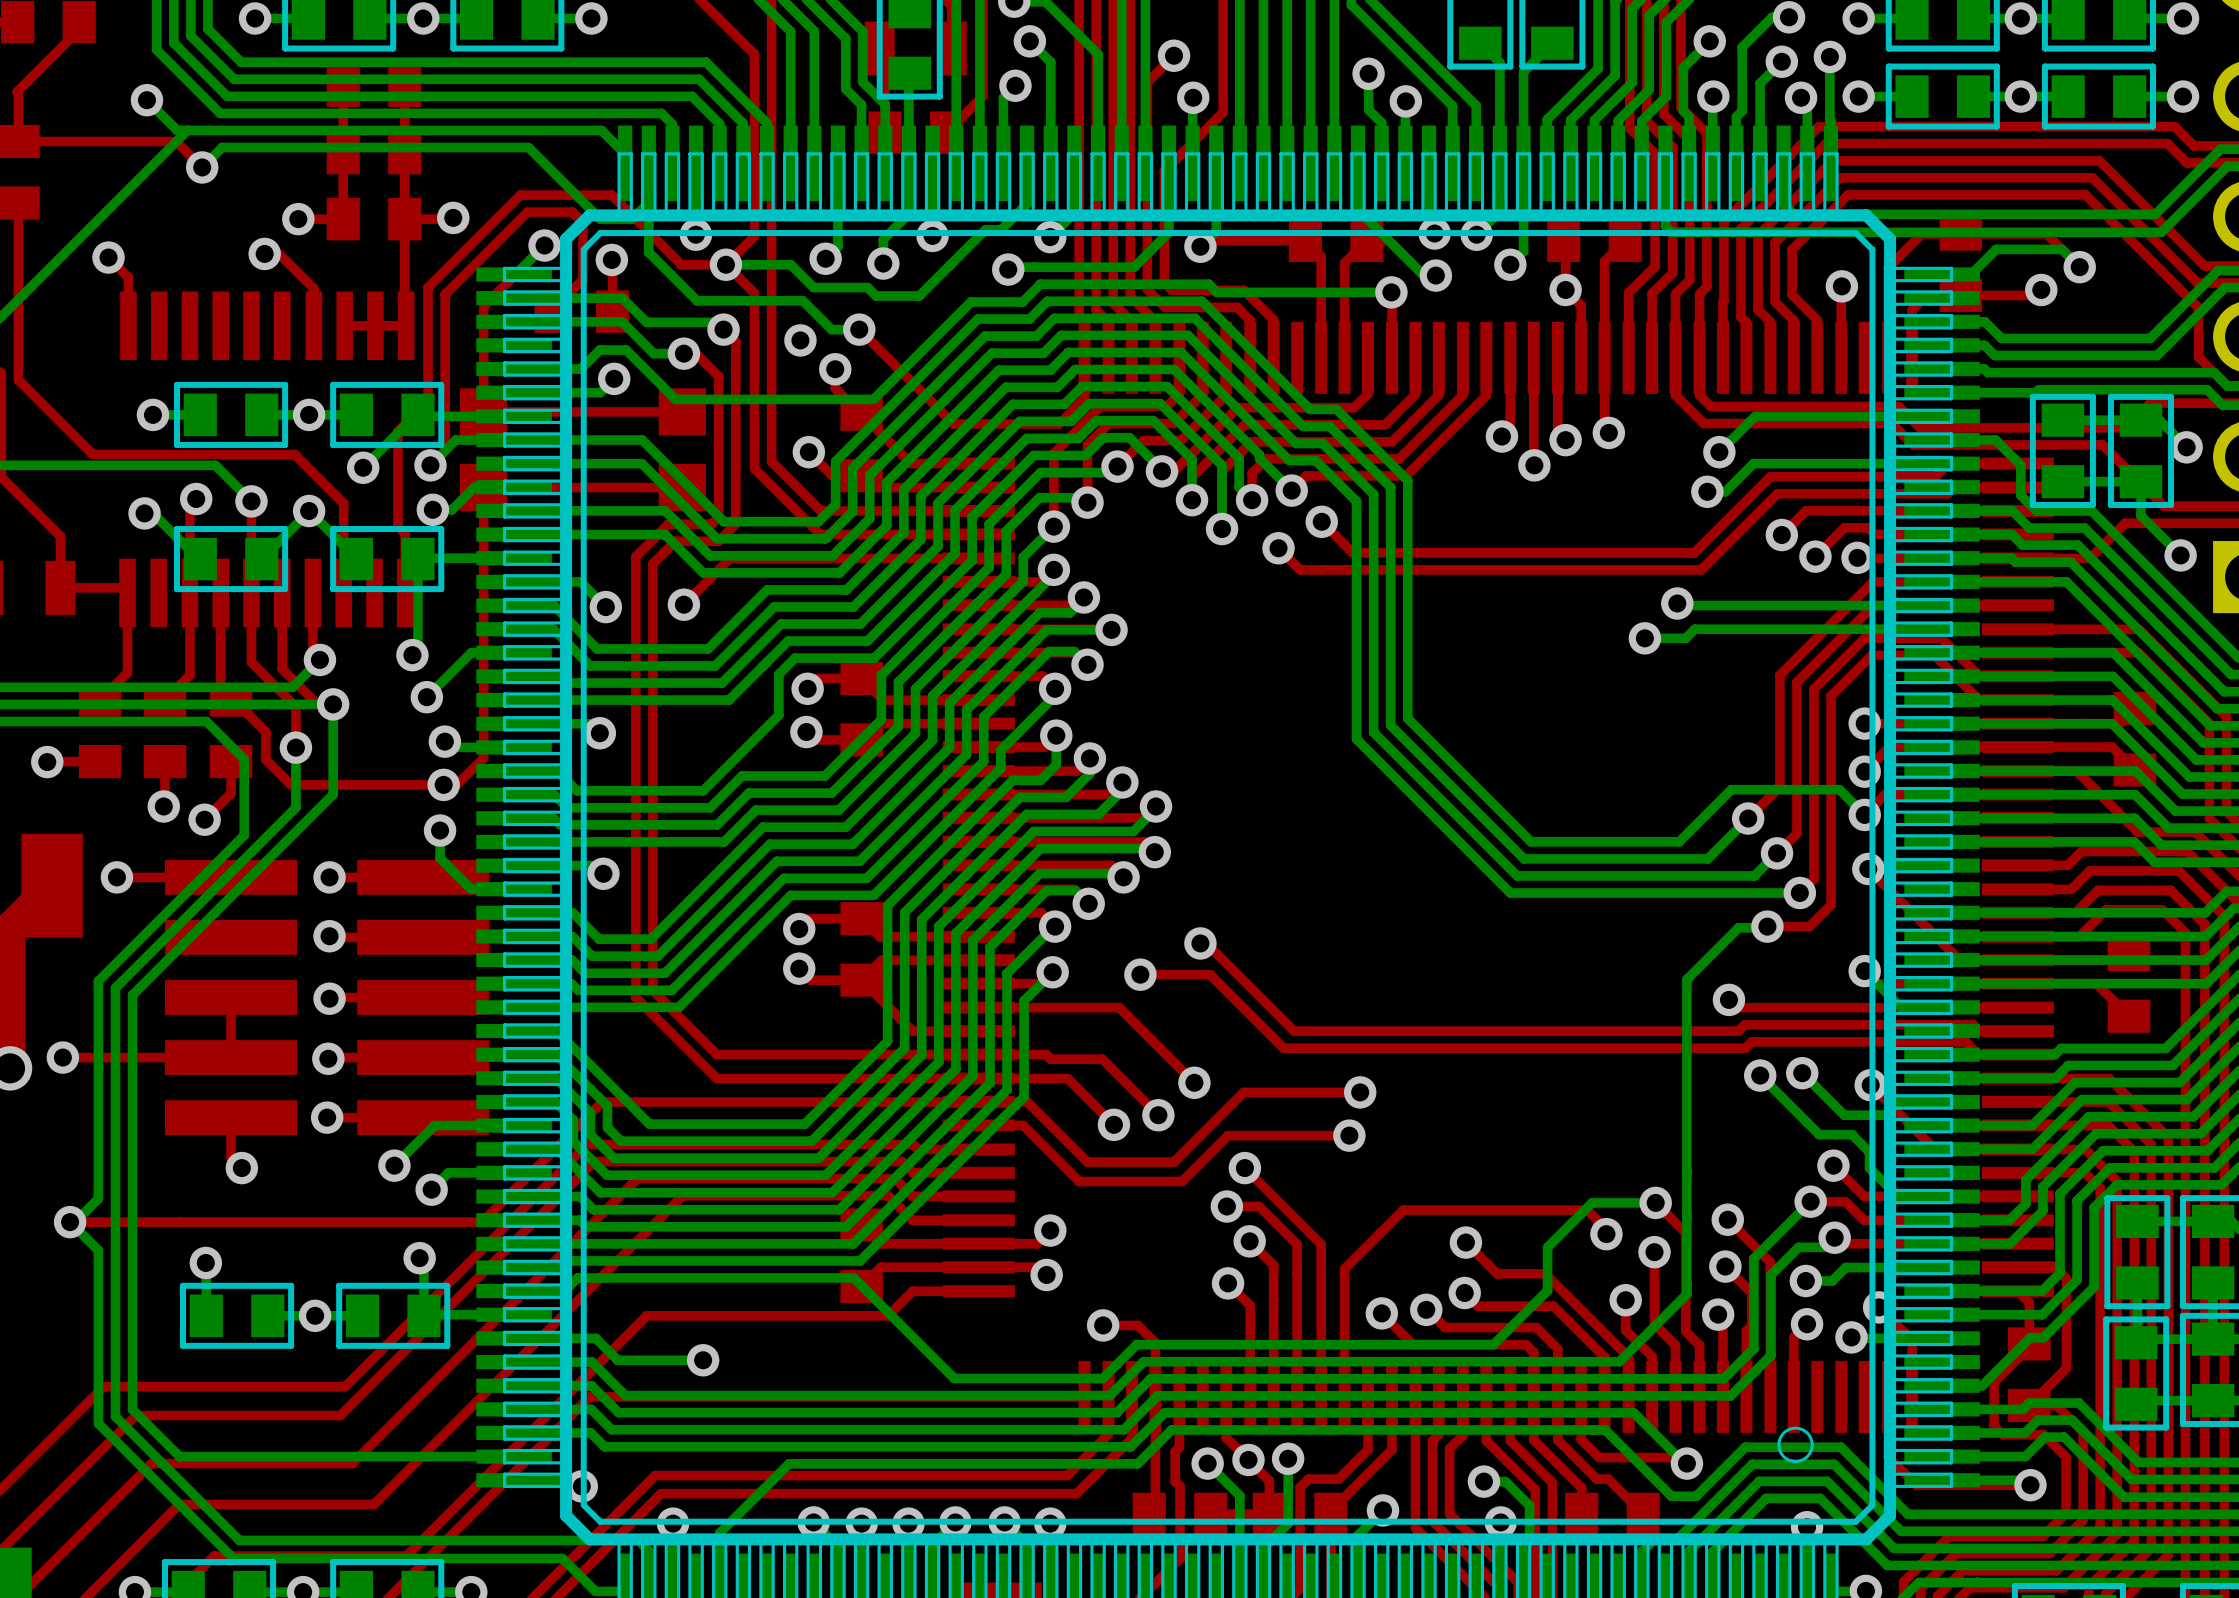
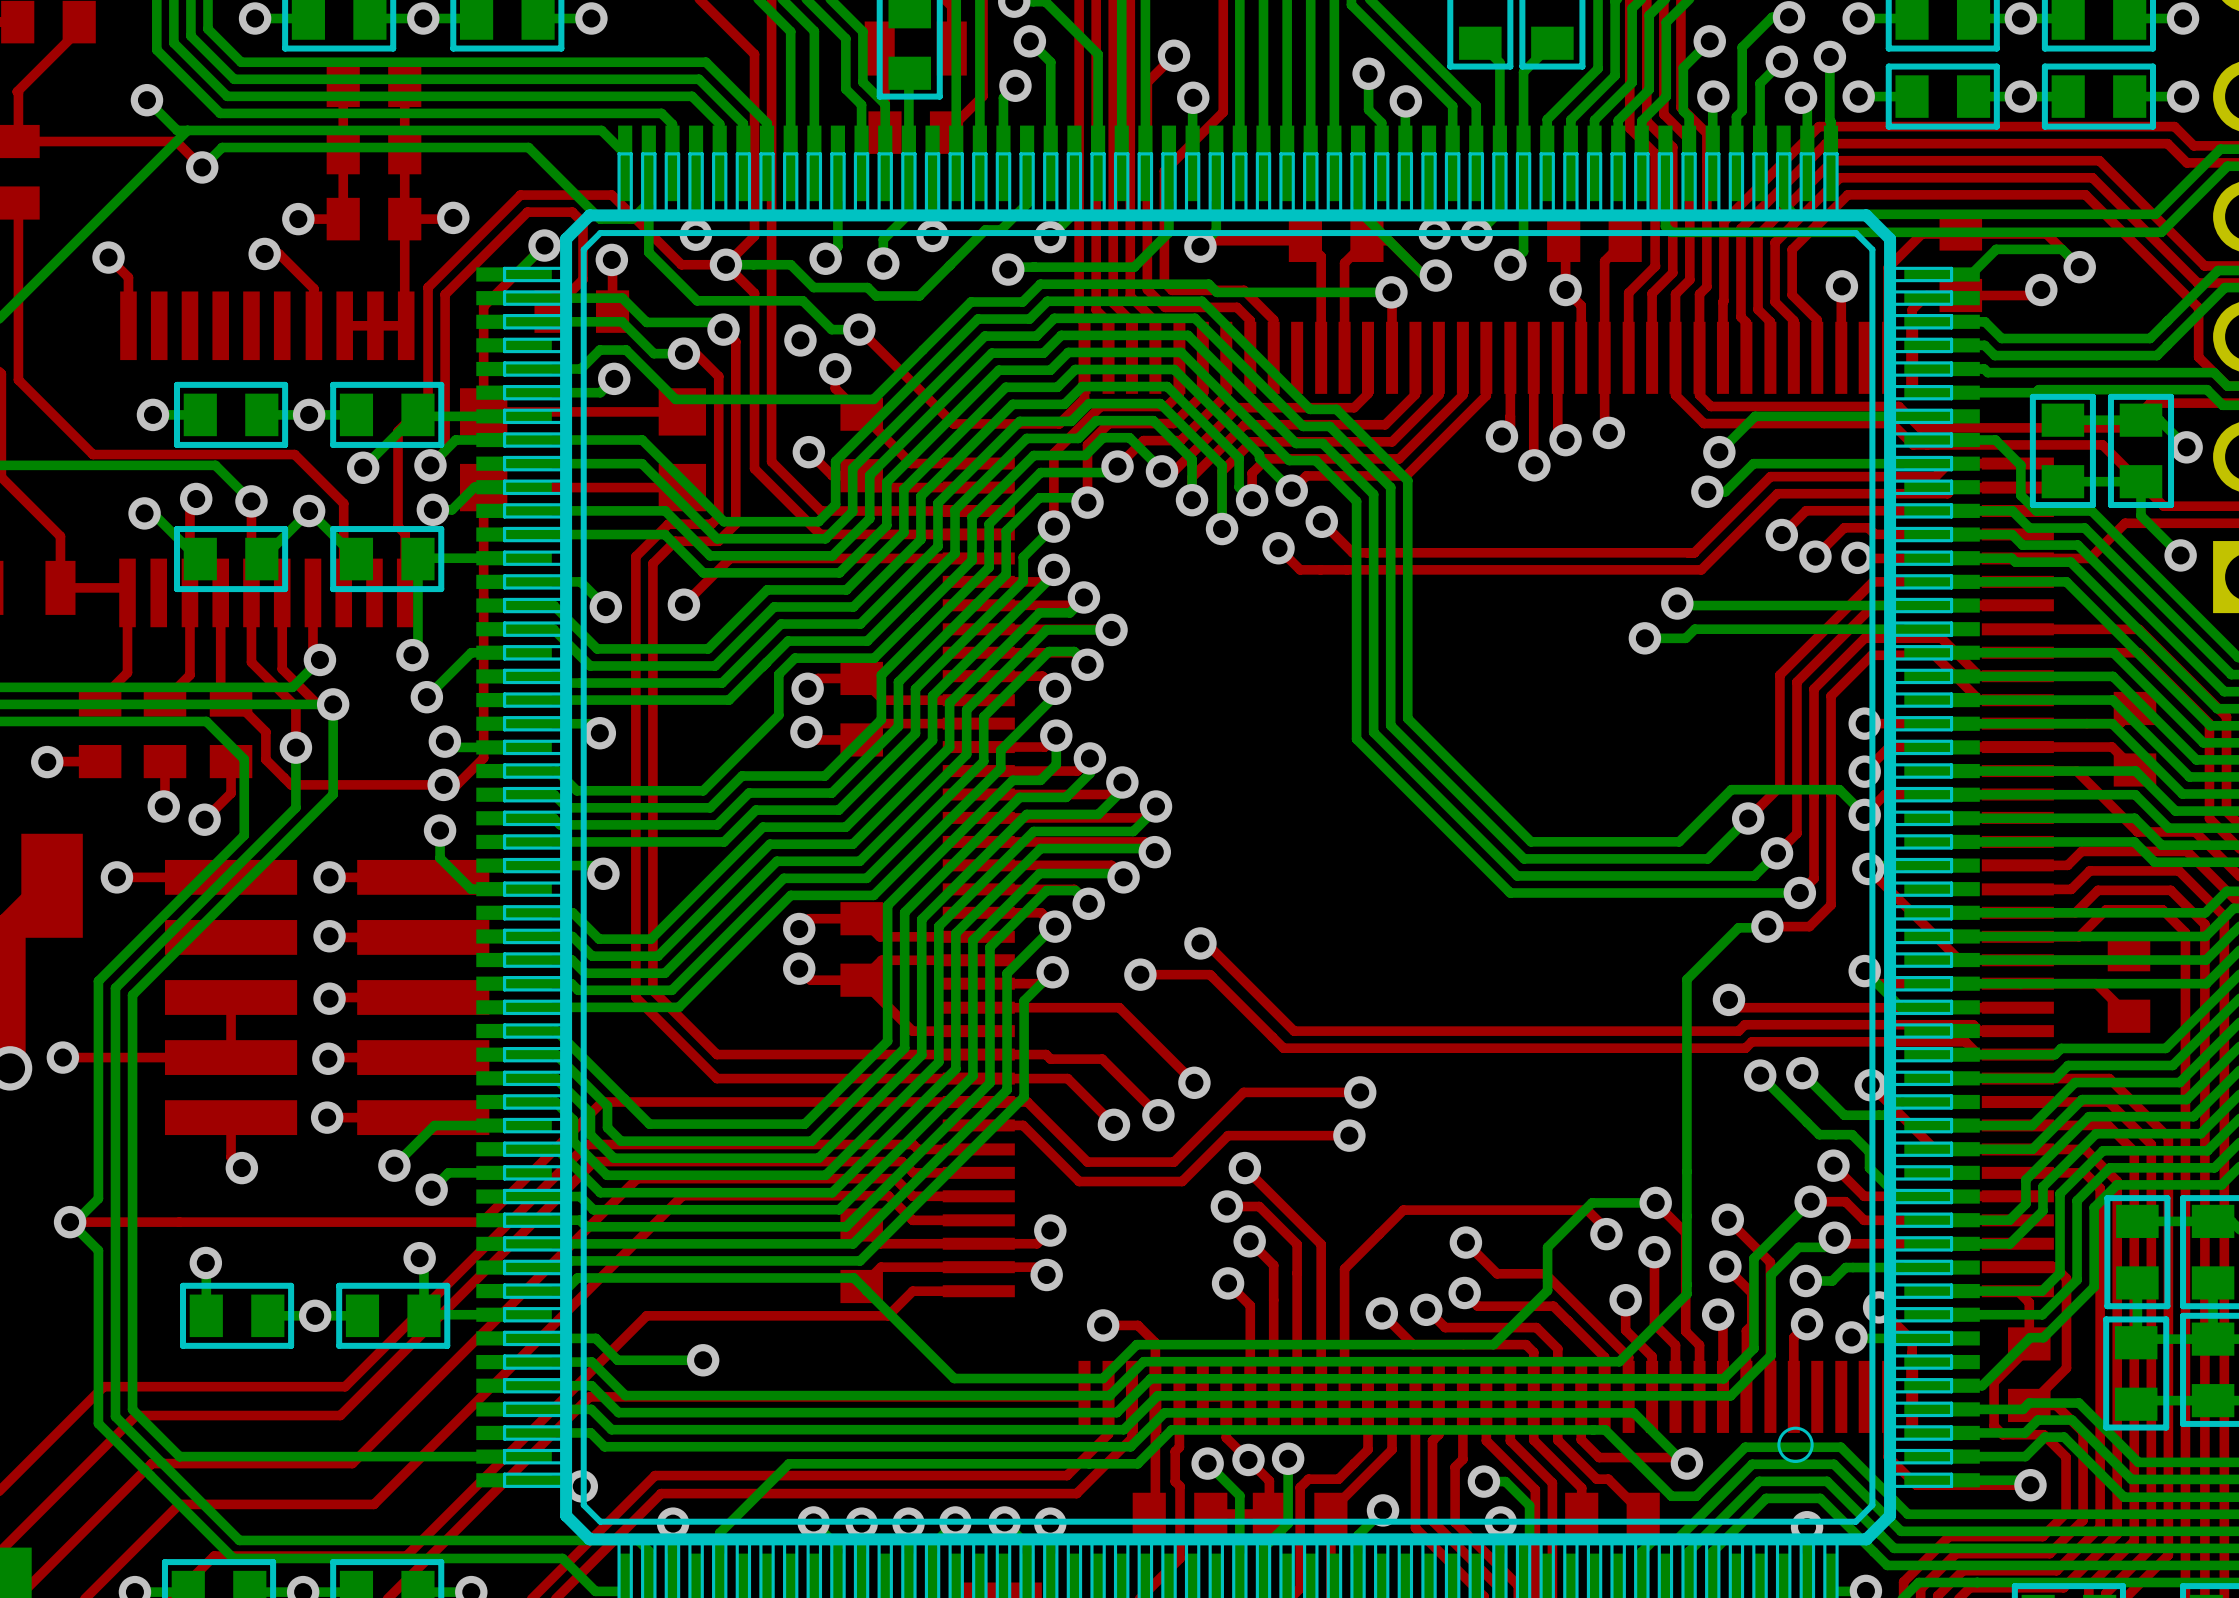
top track: (1462, 1435) (1449, 1448) (1449, 1514) (1518, 1582) (1518, 1585) -> (1462, 1435) (1462, 1459) (1455, 1467) (1455, 1522) (1518, 1585)

